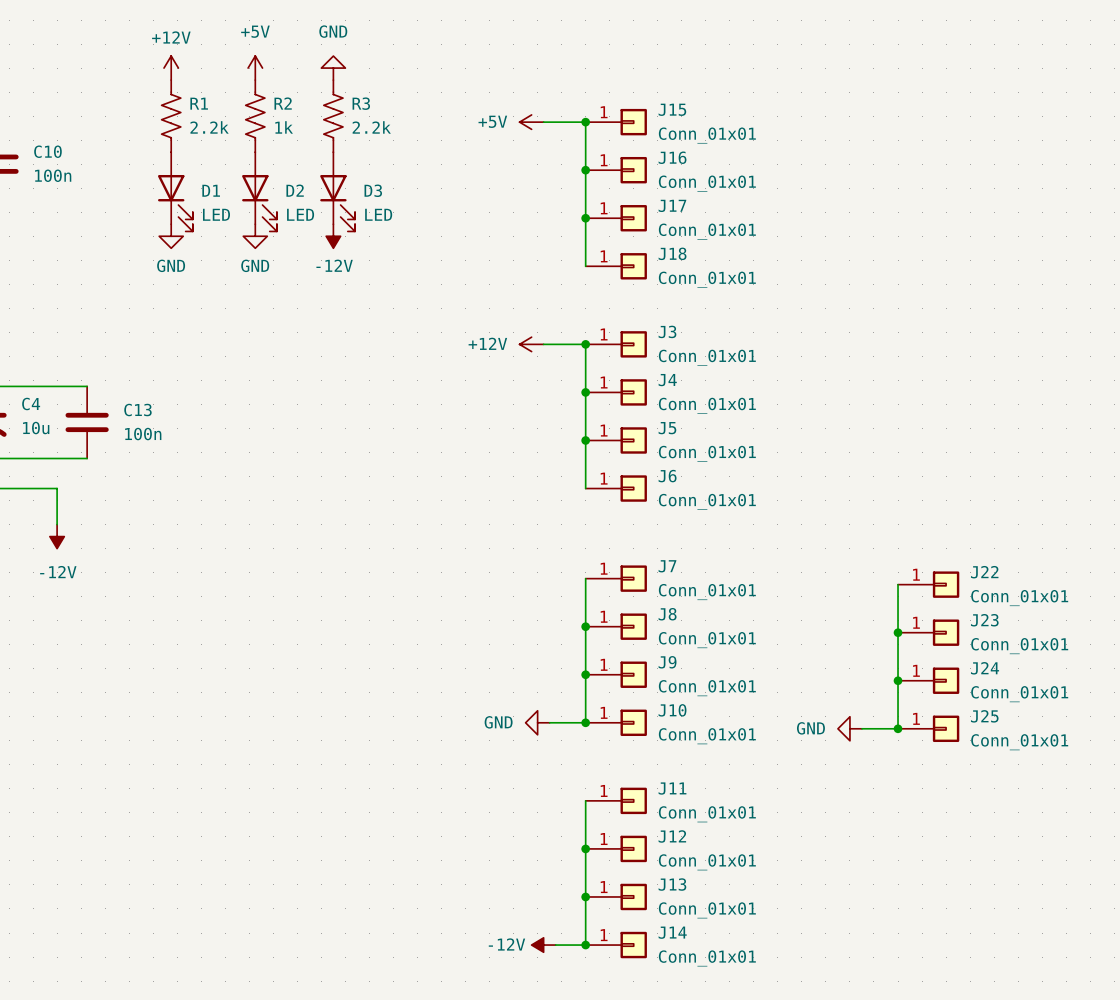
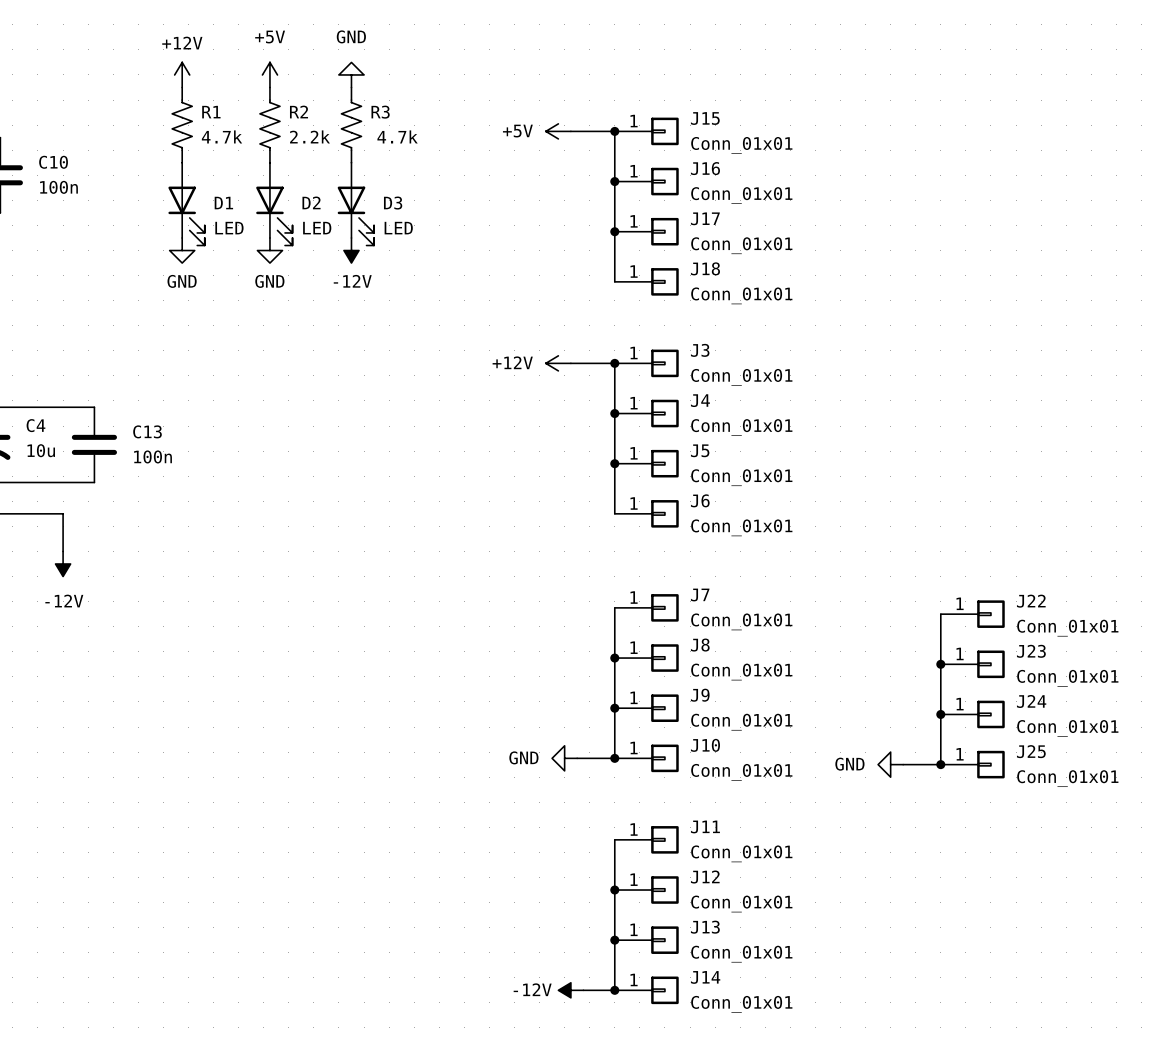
R1 value: 2.2k (209, 127) -> 4.7k (222, 136)
R2 value: 1k (284, 127) -> 2.2k (309, 136)
R3 value: 2.2k (371, 127) -> 4.7k (397, 136)

